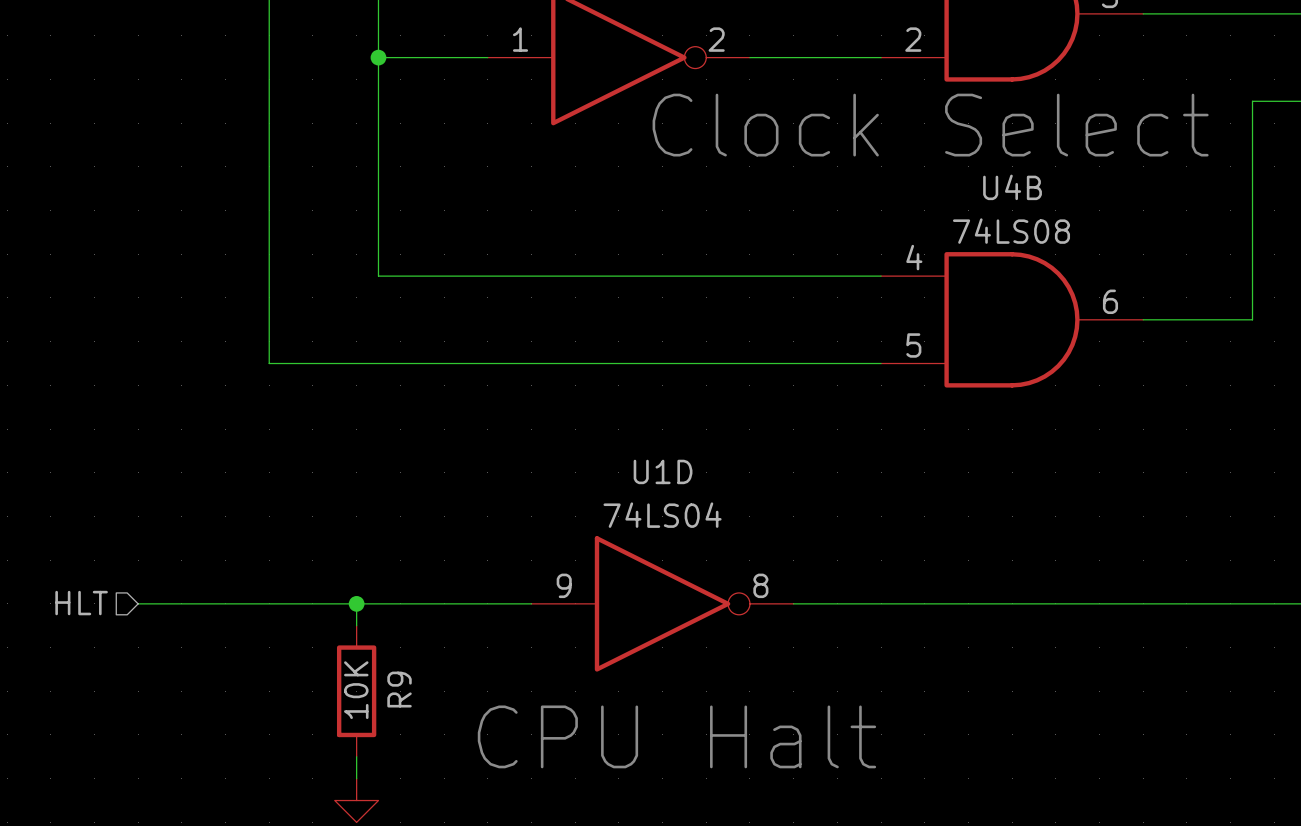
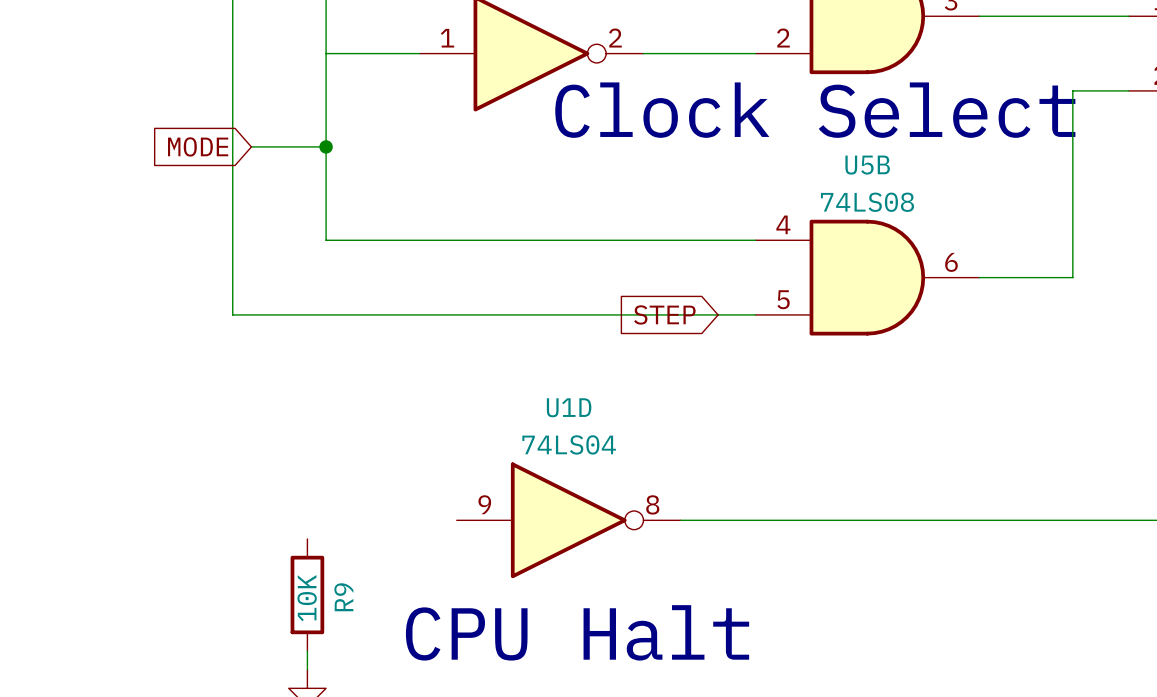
junction: (378, 57) -> none
global label: none -> MODE (198, 146)
wire: none -> (251, 146) (326, 146)
junction: none -> (326, 146)
U4B name: U4B (1012, 187) -> U5B (867, 165)
global label: none -> STEP (664, 314)
hierarchical label: HLT (81, 603) -> none
wire: (138, 603) (531, 603) -> none
wire: (356, 603) (356, 625) -> none
junction: (356, 603) -> none

